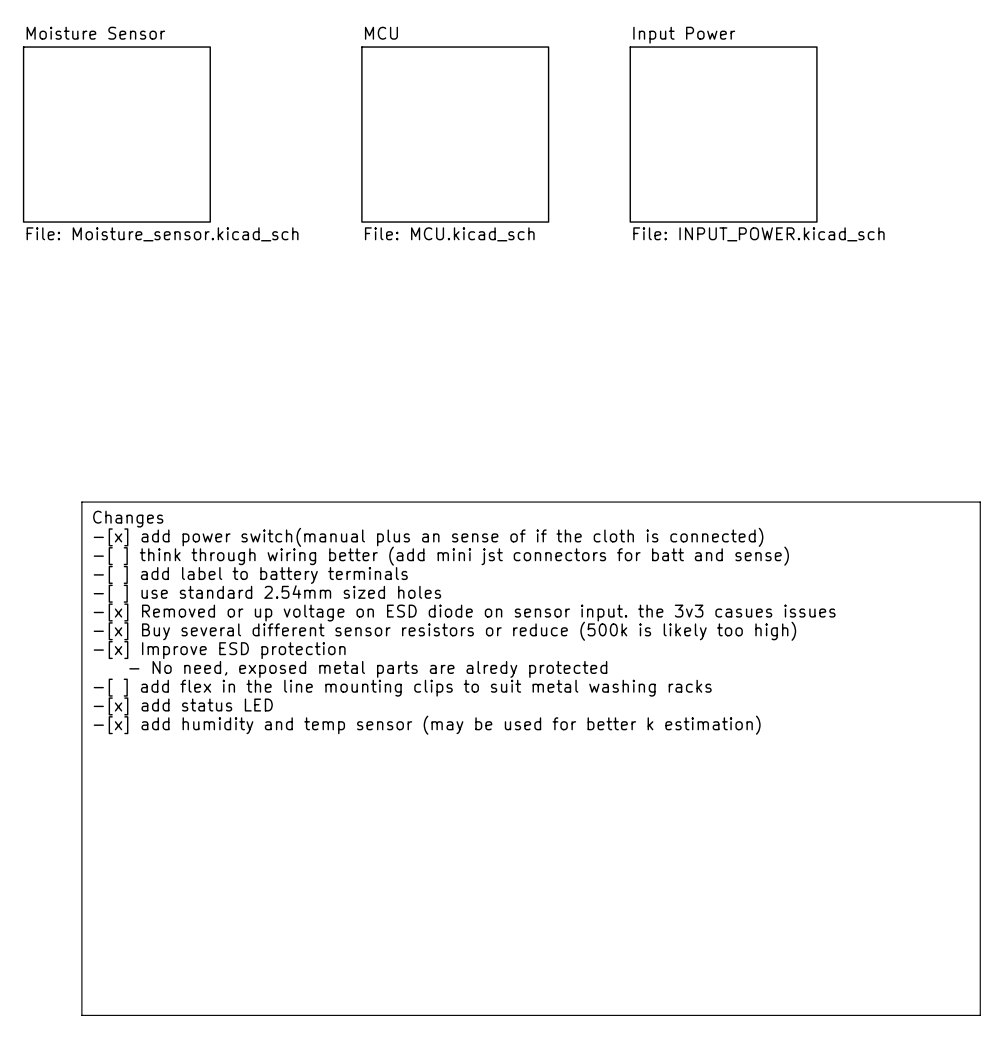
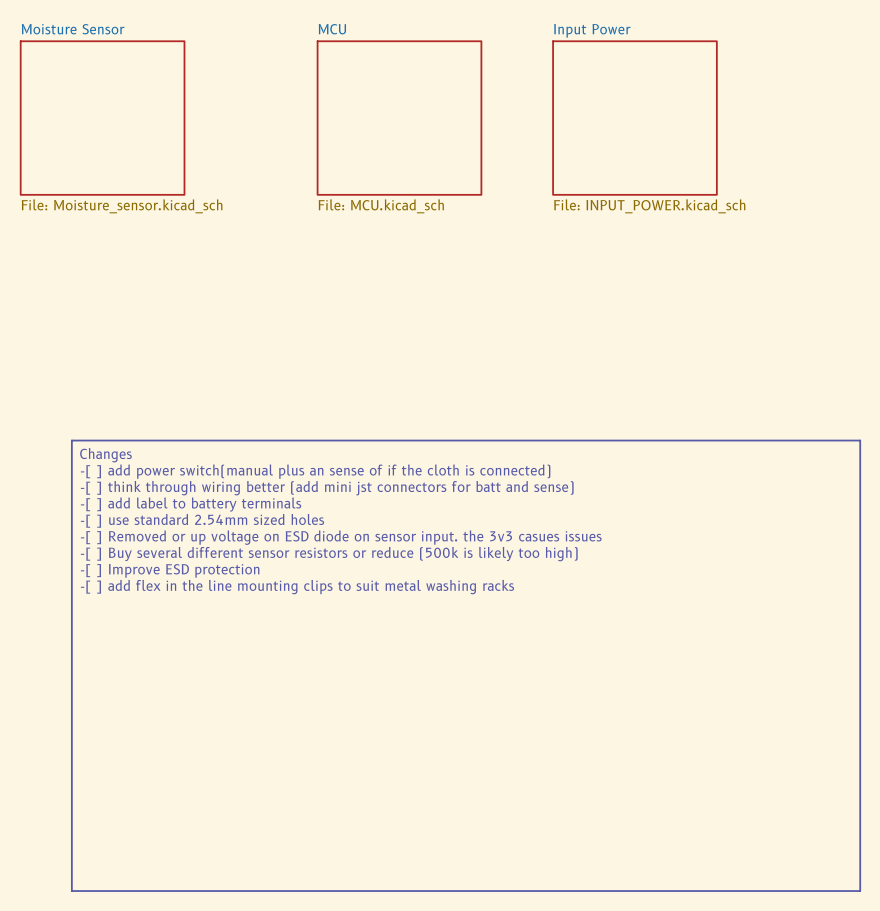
text: -[x] add power switch(manual plus an sense of if the cloth is connected) (428, 537) -> -[ ] add power switch(manual plus an sense of if the cloth is connected) (315, 471)
text: -[x] Removed or up voltage on ESD diode on sensor input. the 3v3 casues issues (464, 612) -> -[ ] Removed or up voltage on ESD diode on sensor input. the 3v3 casues issues (341, 537)
text: -[x] Buy several different sensor resistors or reduce (500k is likely too high) (444, 631) -> -[ ] Buy several different sensor resistors or reduce (500k is likely too high) (329, 554)
text: -[x] Improve ESD protection (219, 650) -> -[ ] Improve ESD protection (170, 570)
text: - No need, exposed metal parts are alredy protected (368, 669) -> -[ ] add flex in the line mounting clips to suit metal washing racks (297, 587)
text: -[ ] add flex in the line mounting clips to suit metal washing racks (402, 687) -> none
text: -[x] add status LED (183, 706) -> none
text: -[x] add humidity and temp sensor (may be used for better k estimation) (427, 725) -> none

